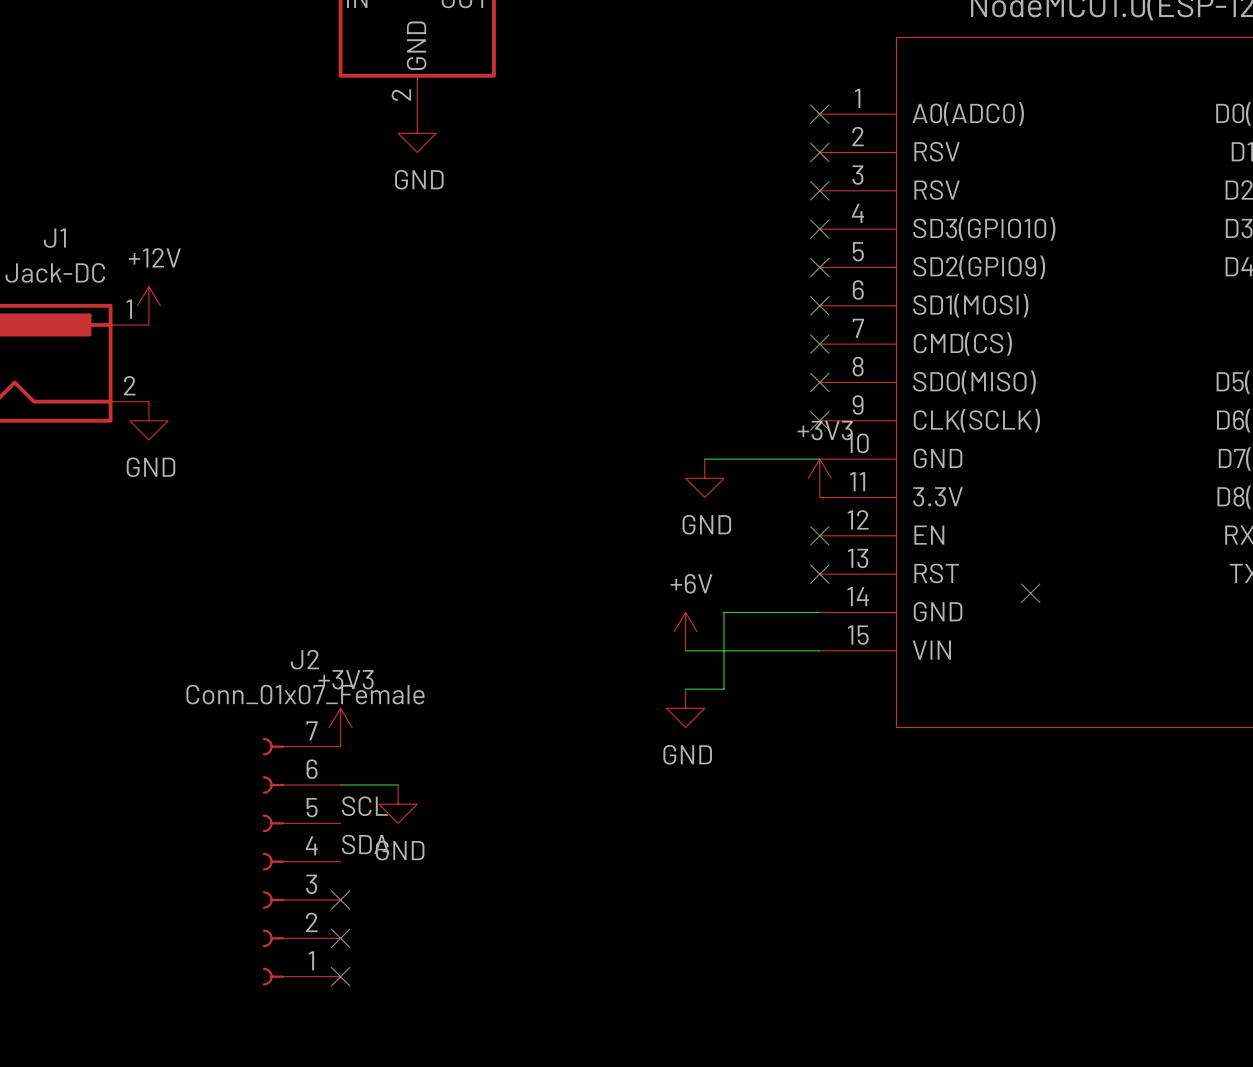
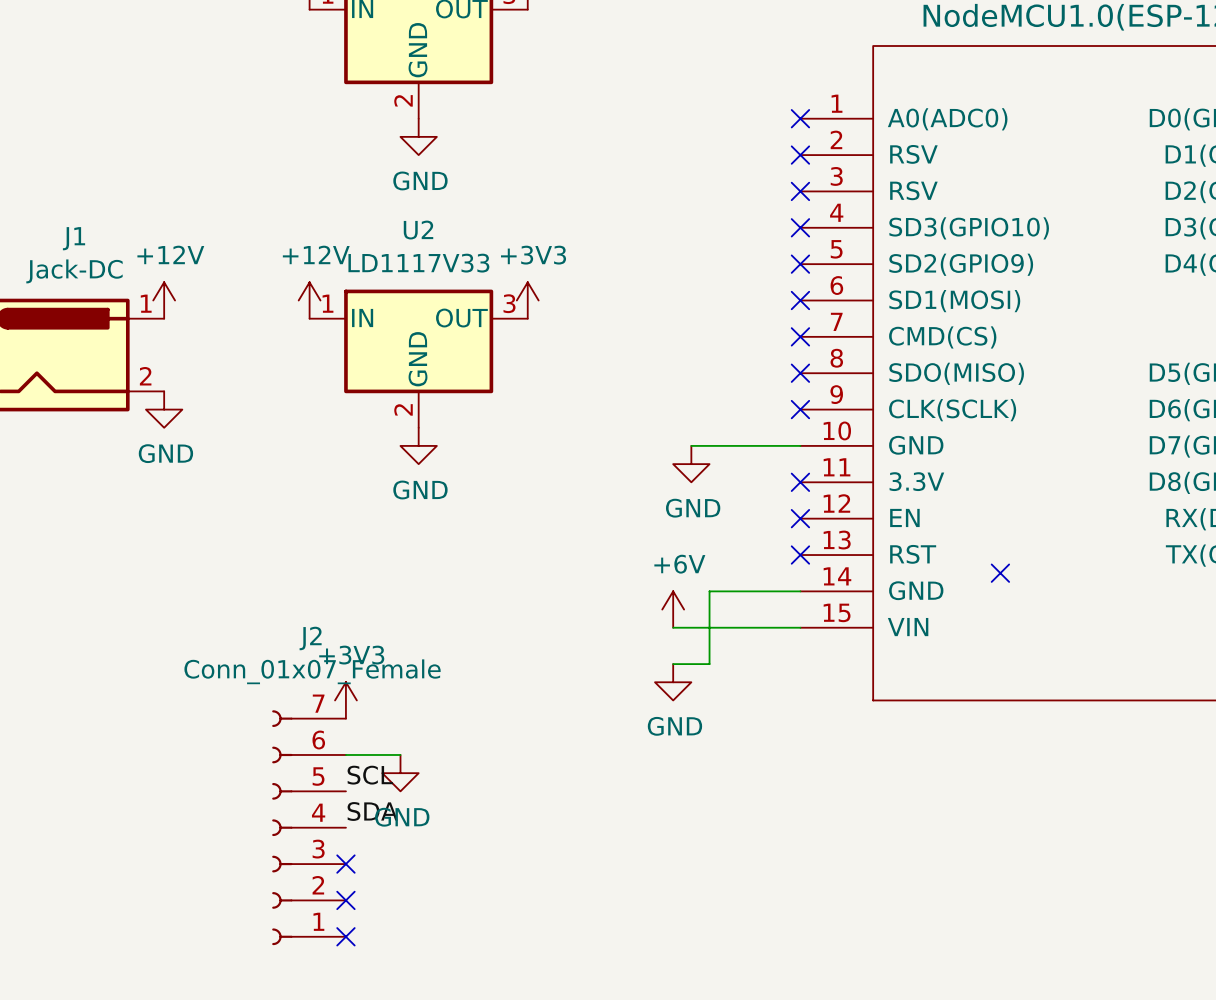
power symbol: none -> +12V (309, 300)
U2: none -> LD1117V33 (418, 358)
power symbol: none -> GND (418, 445)
power symbol position: +3V3 (819, 478) -> +3V3 (527, 300)
no-connect mark: none -> (800, 482)

